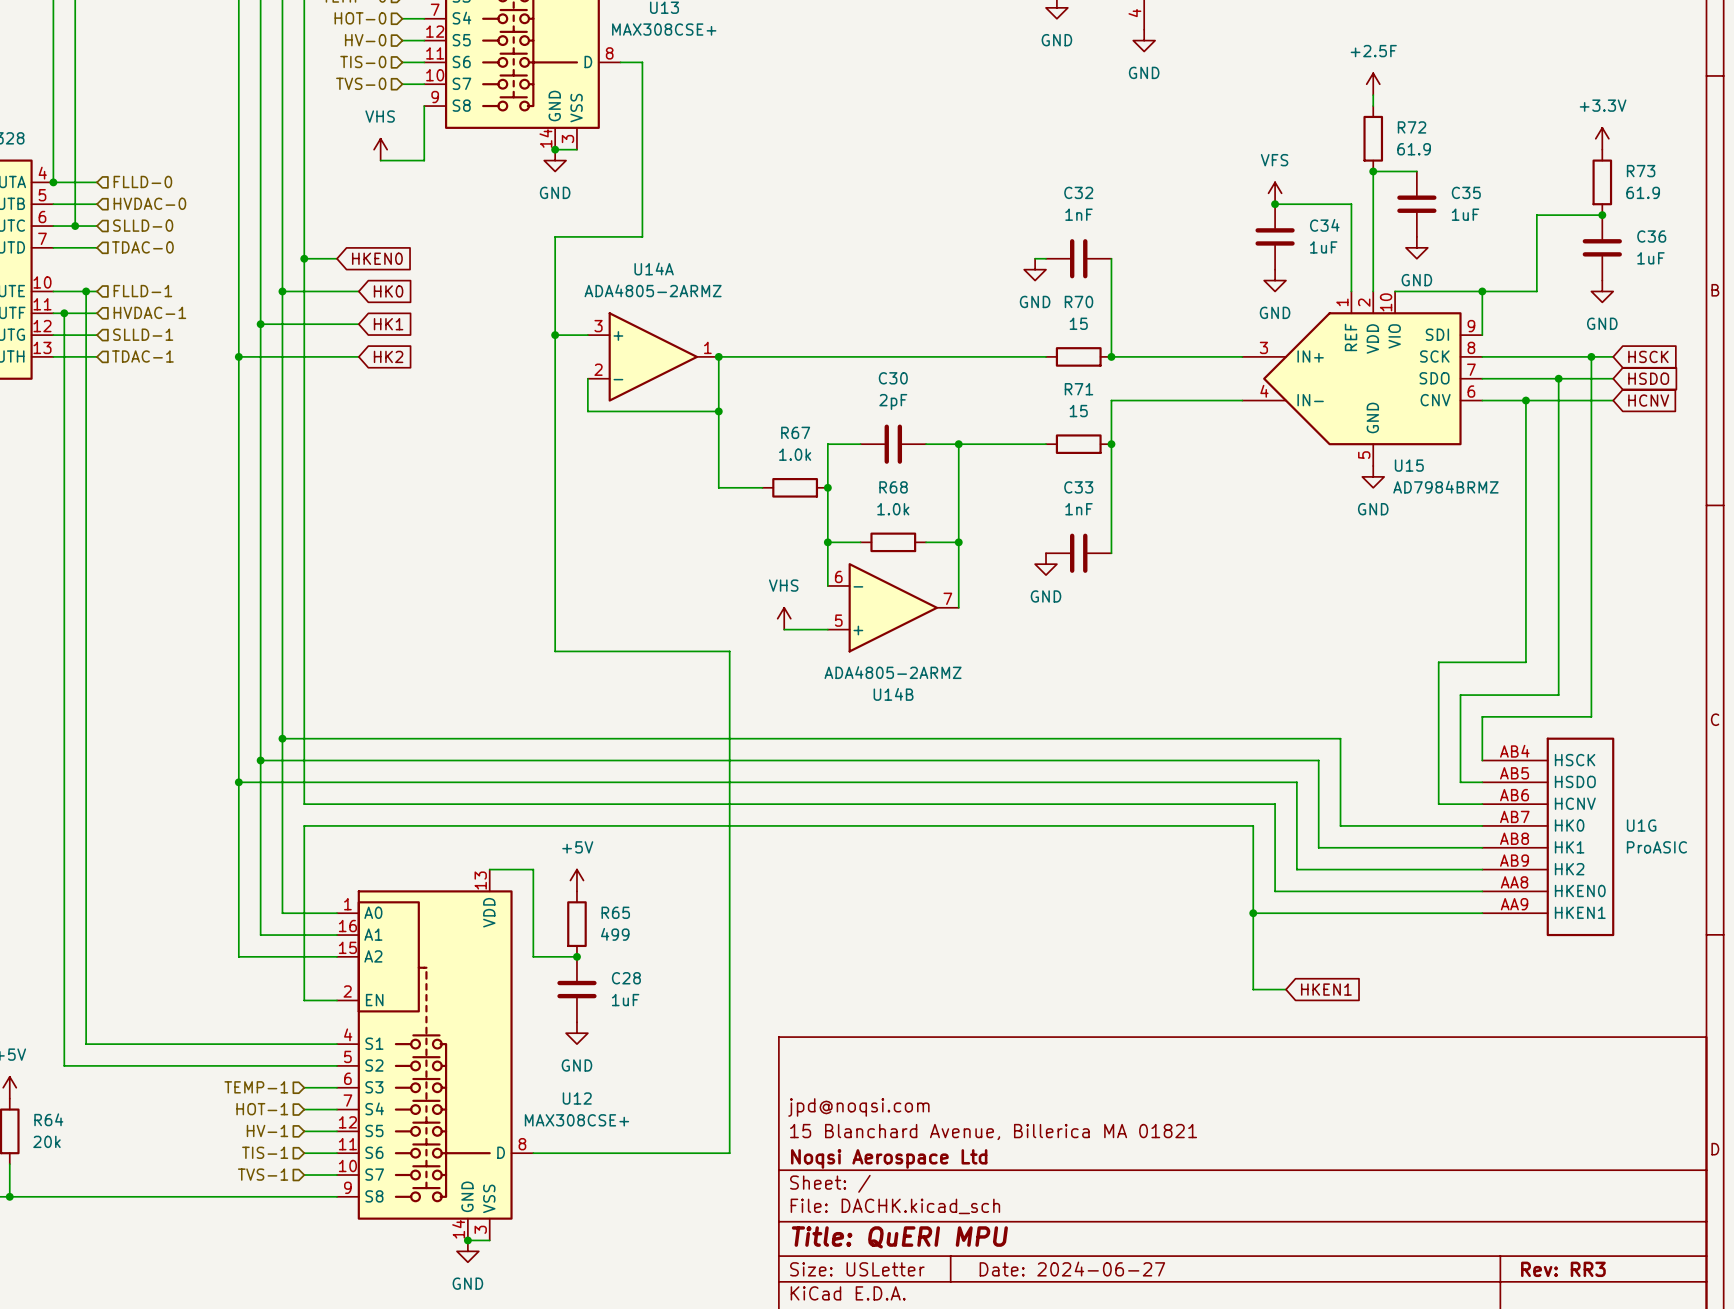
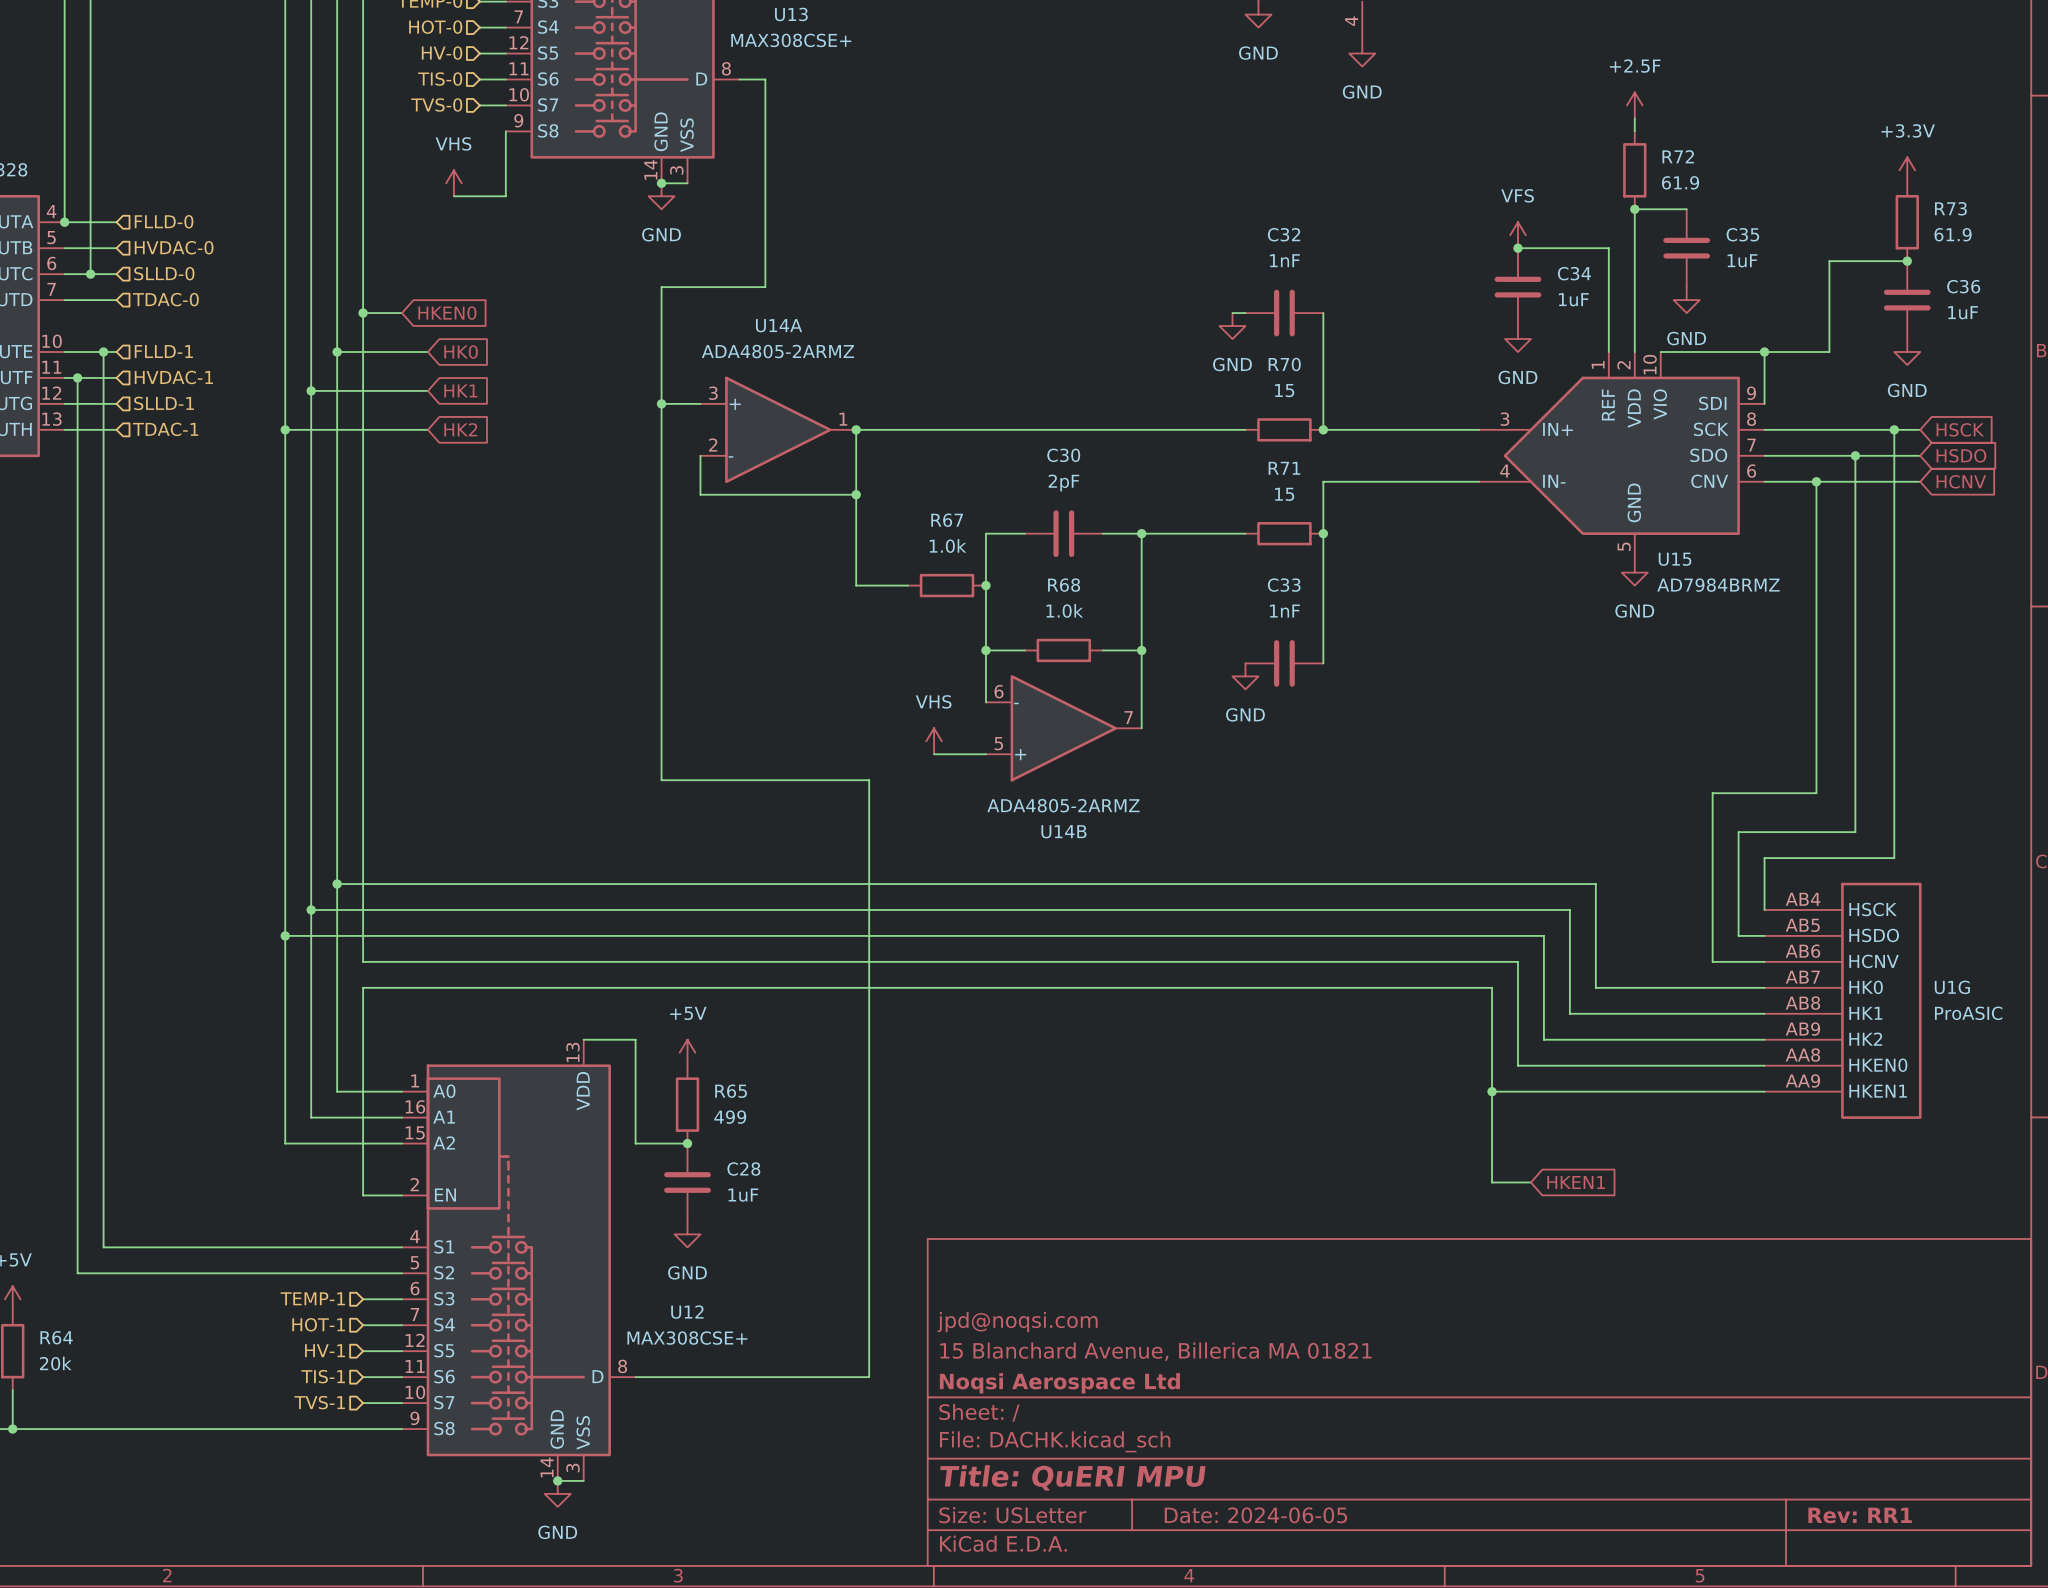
title block: Date: 2024-06-27 (1072, 1269) -> Date: 2024-06-05 (1255, 1515)
title block: Rev: RR3 (1563, 1269) -> Rev: RR1 (1860, 1515)

